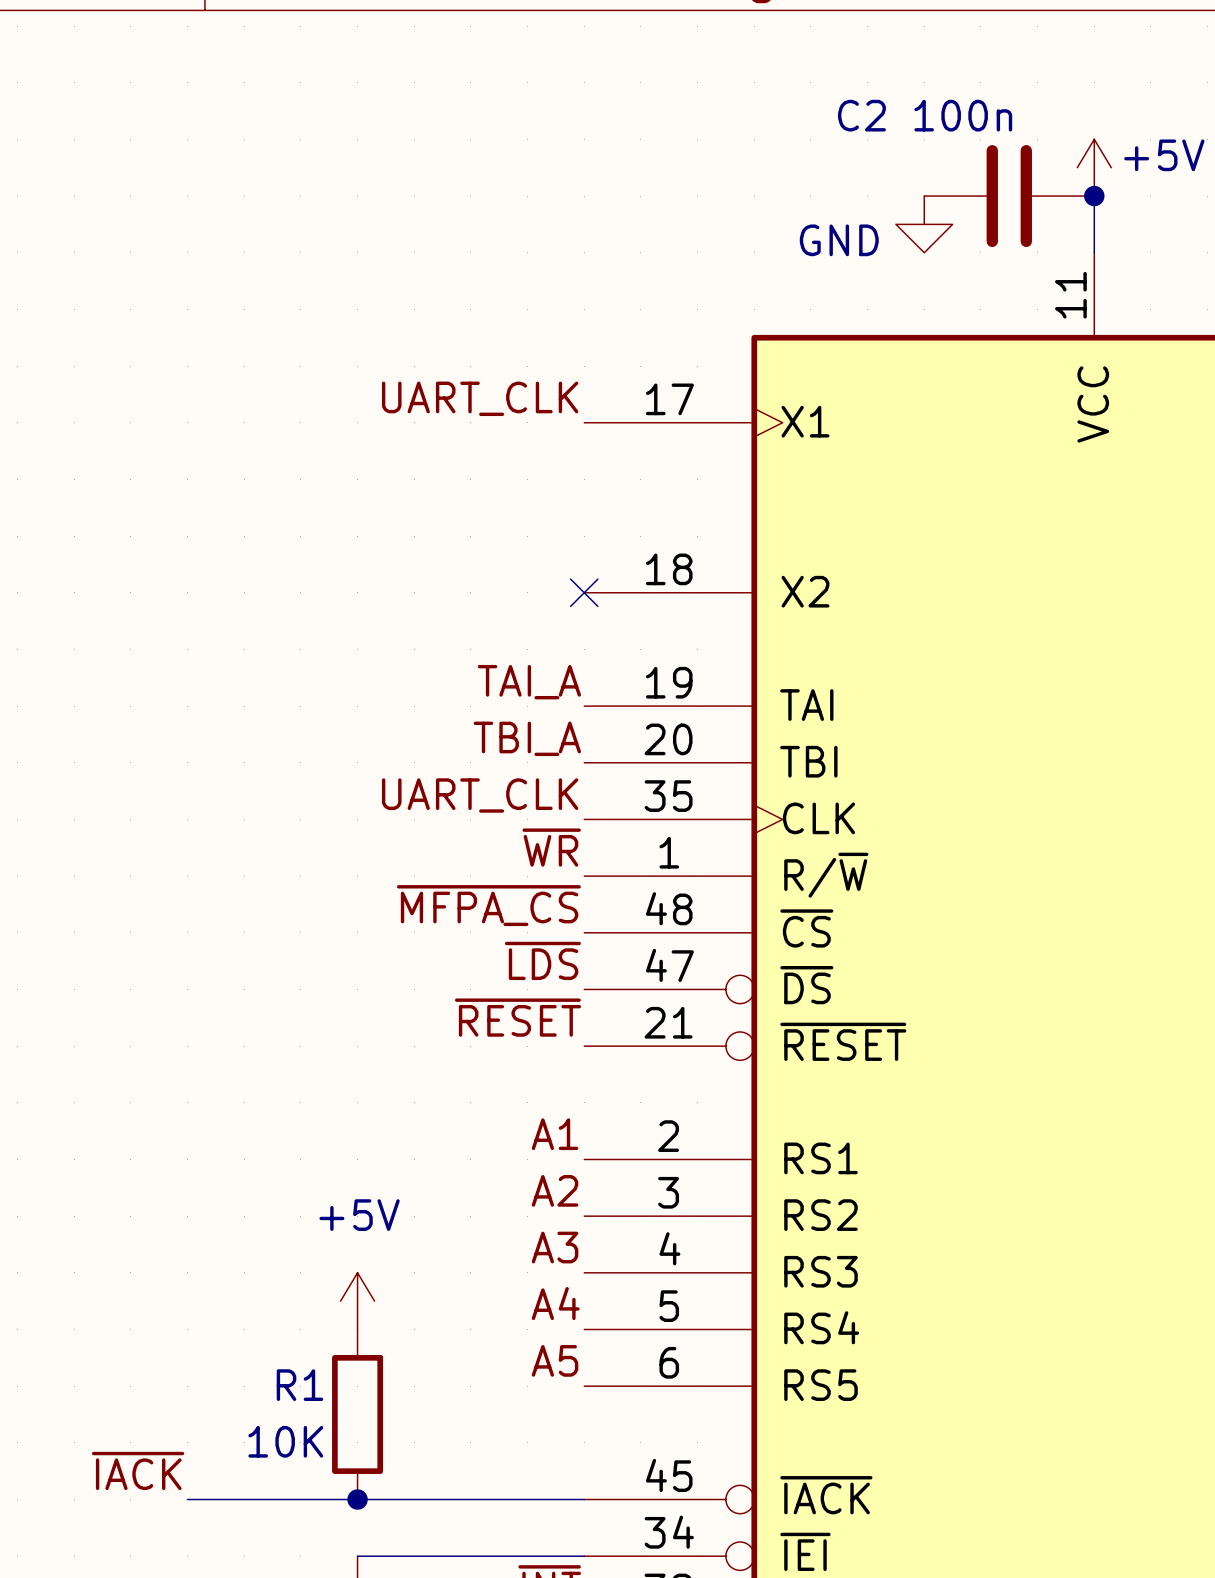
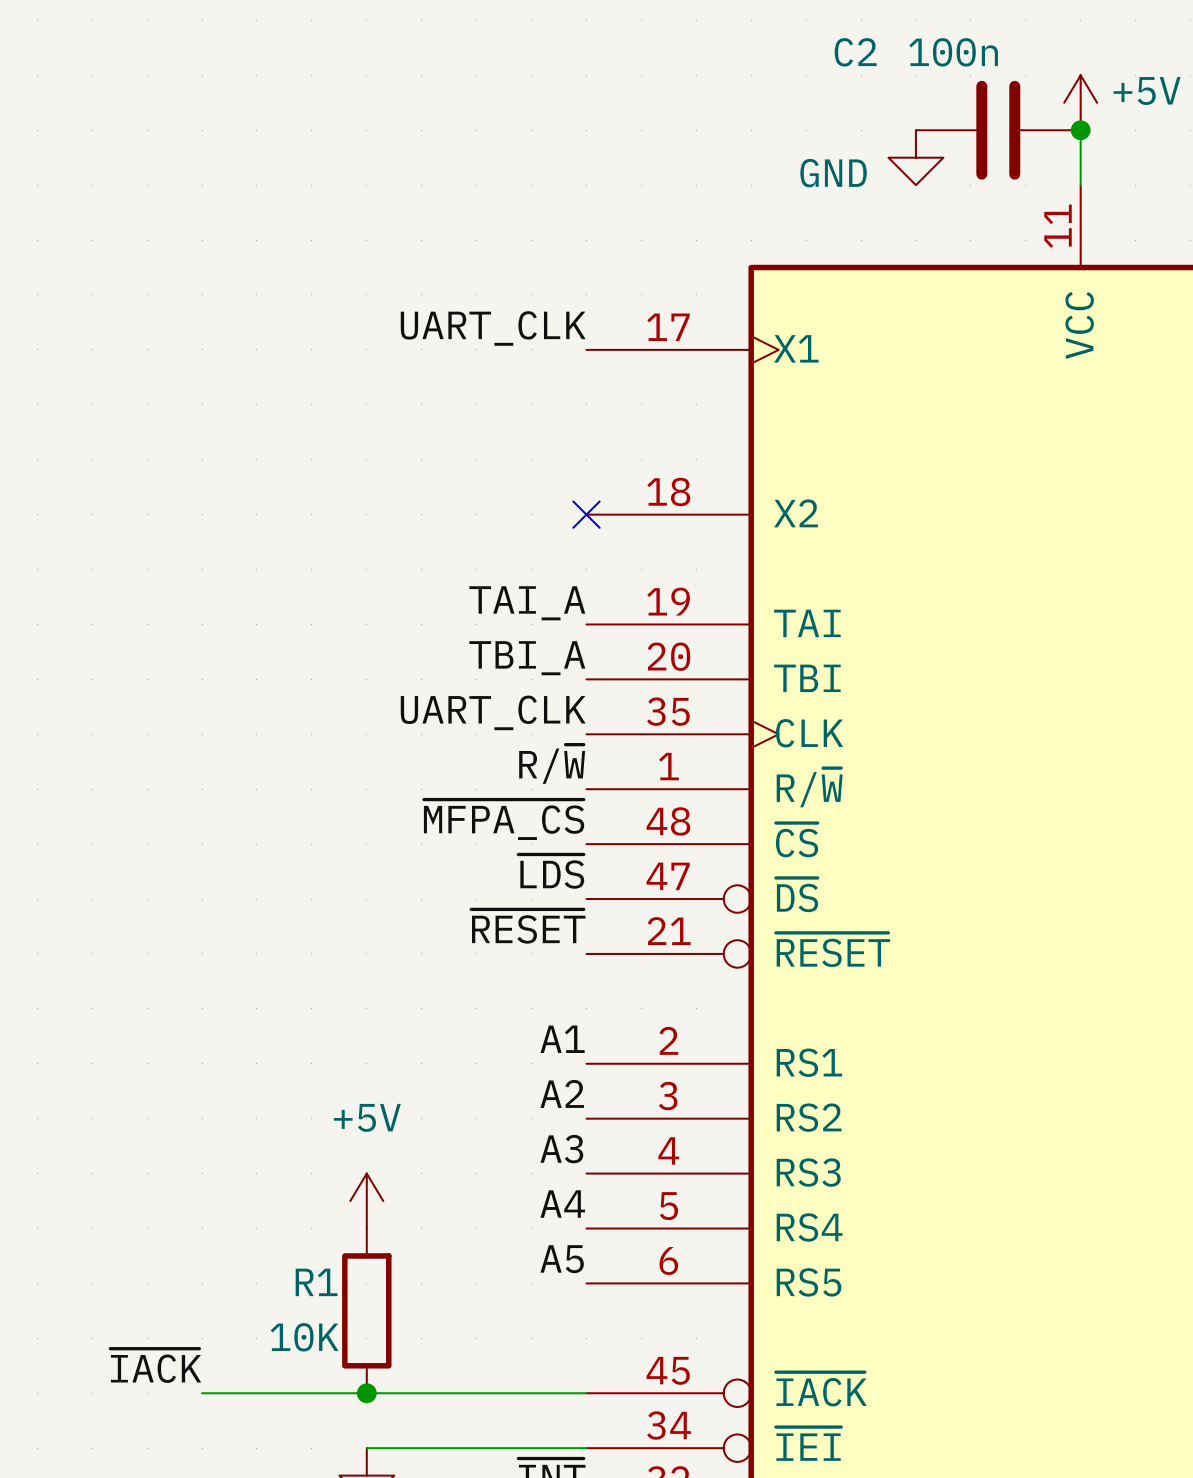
label: ~{WR} (551, 847) -> R/~{W} (552, 764)

